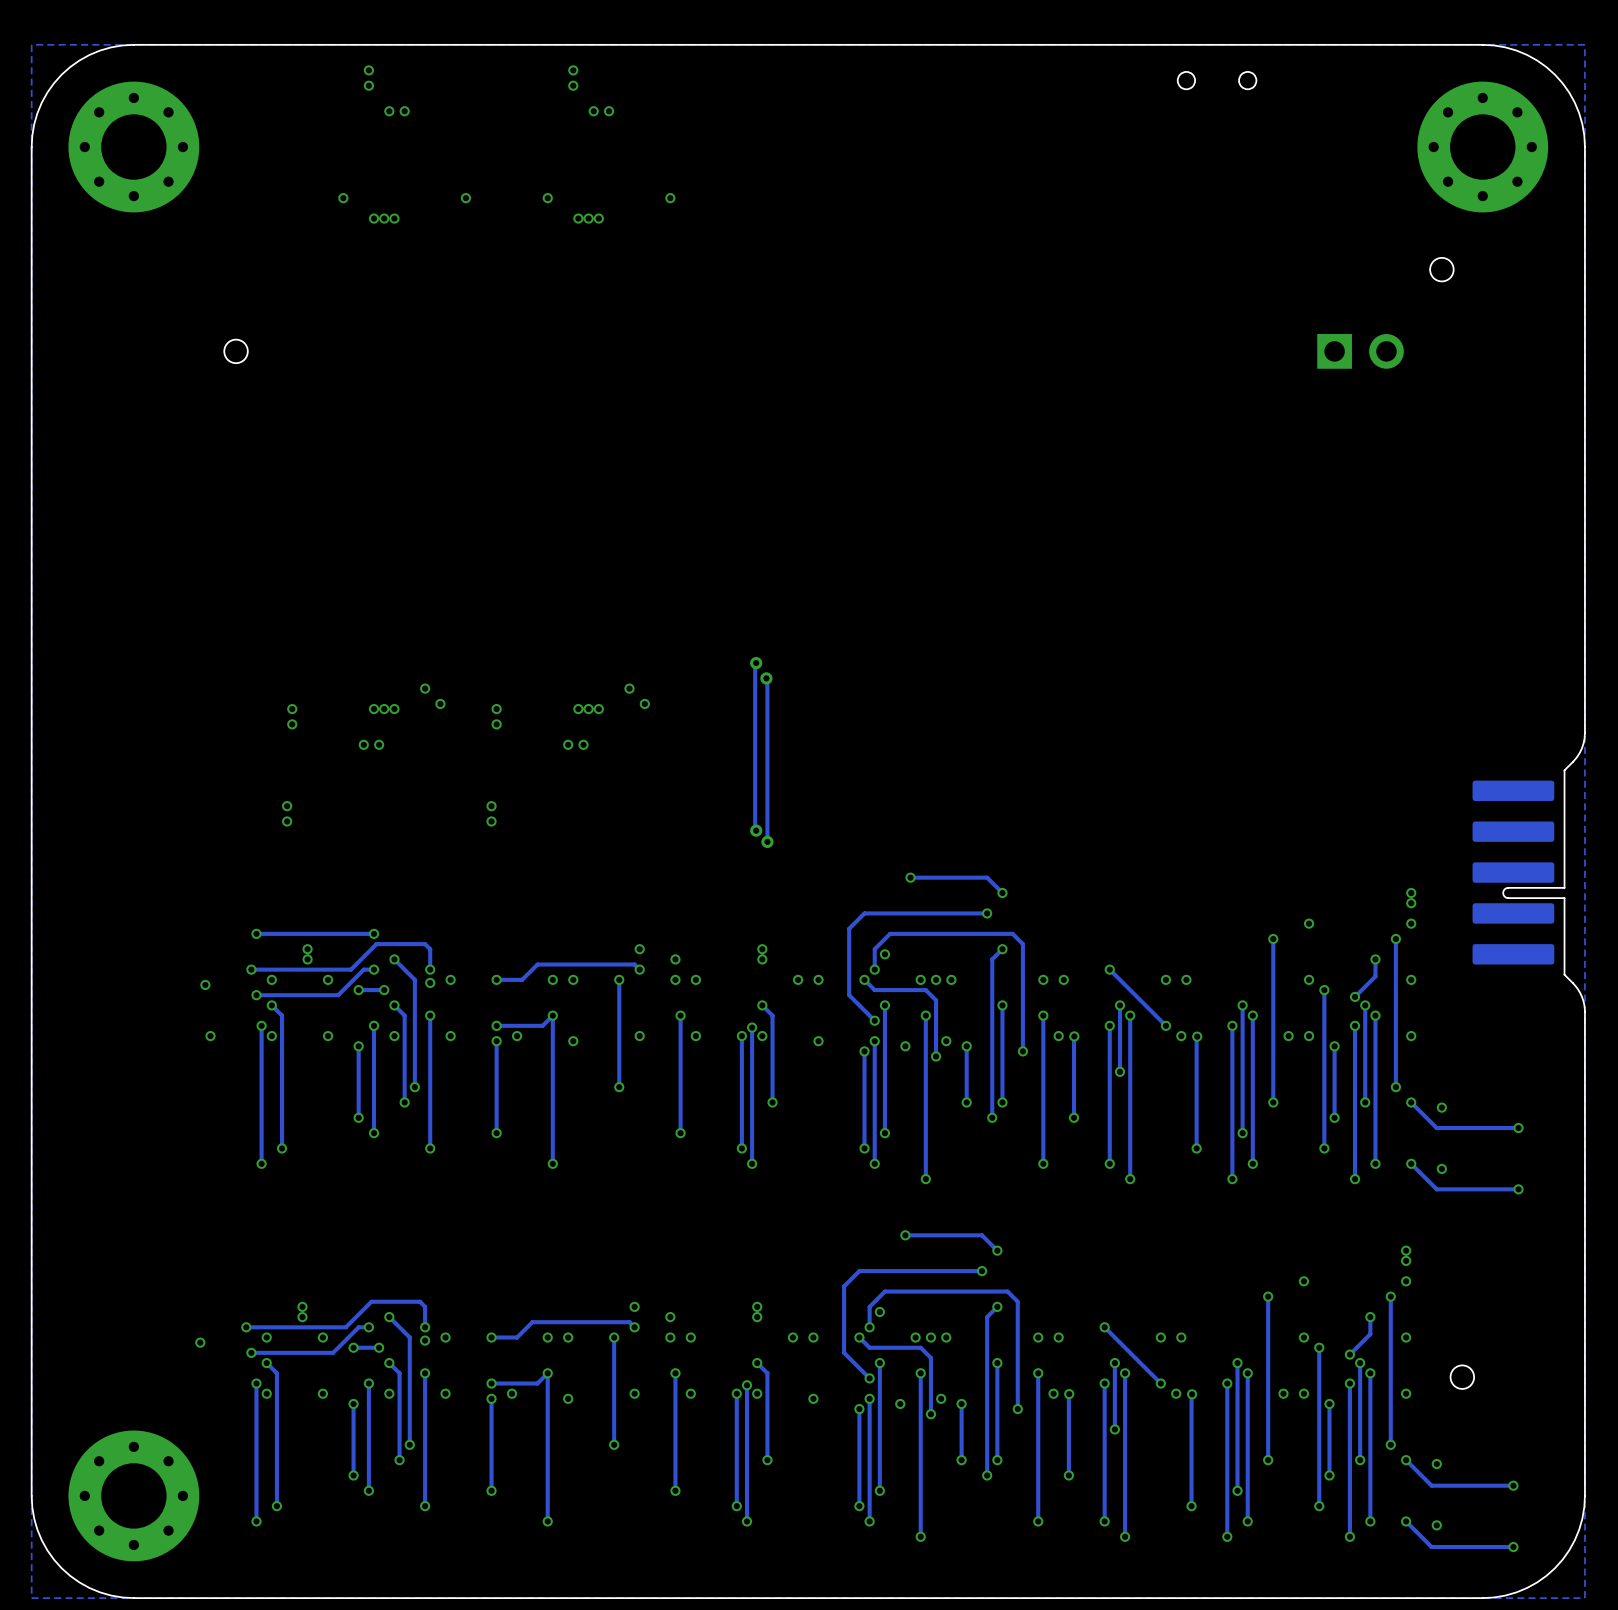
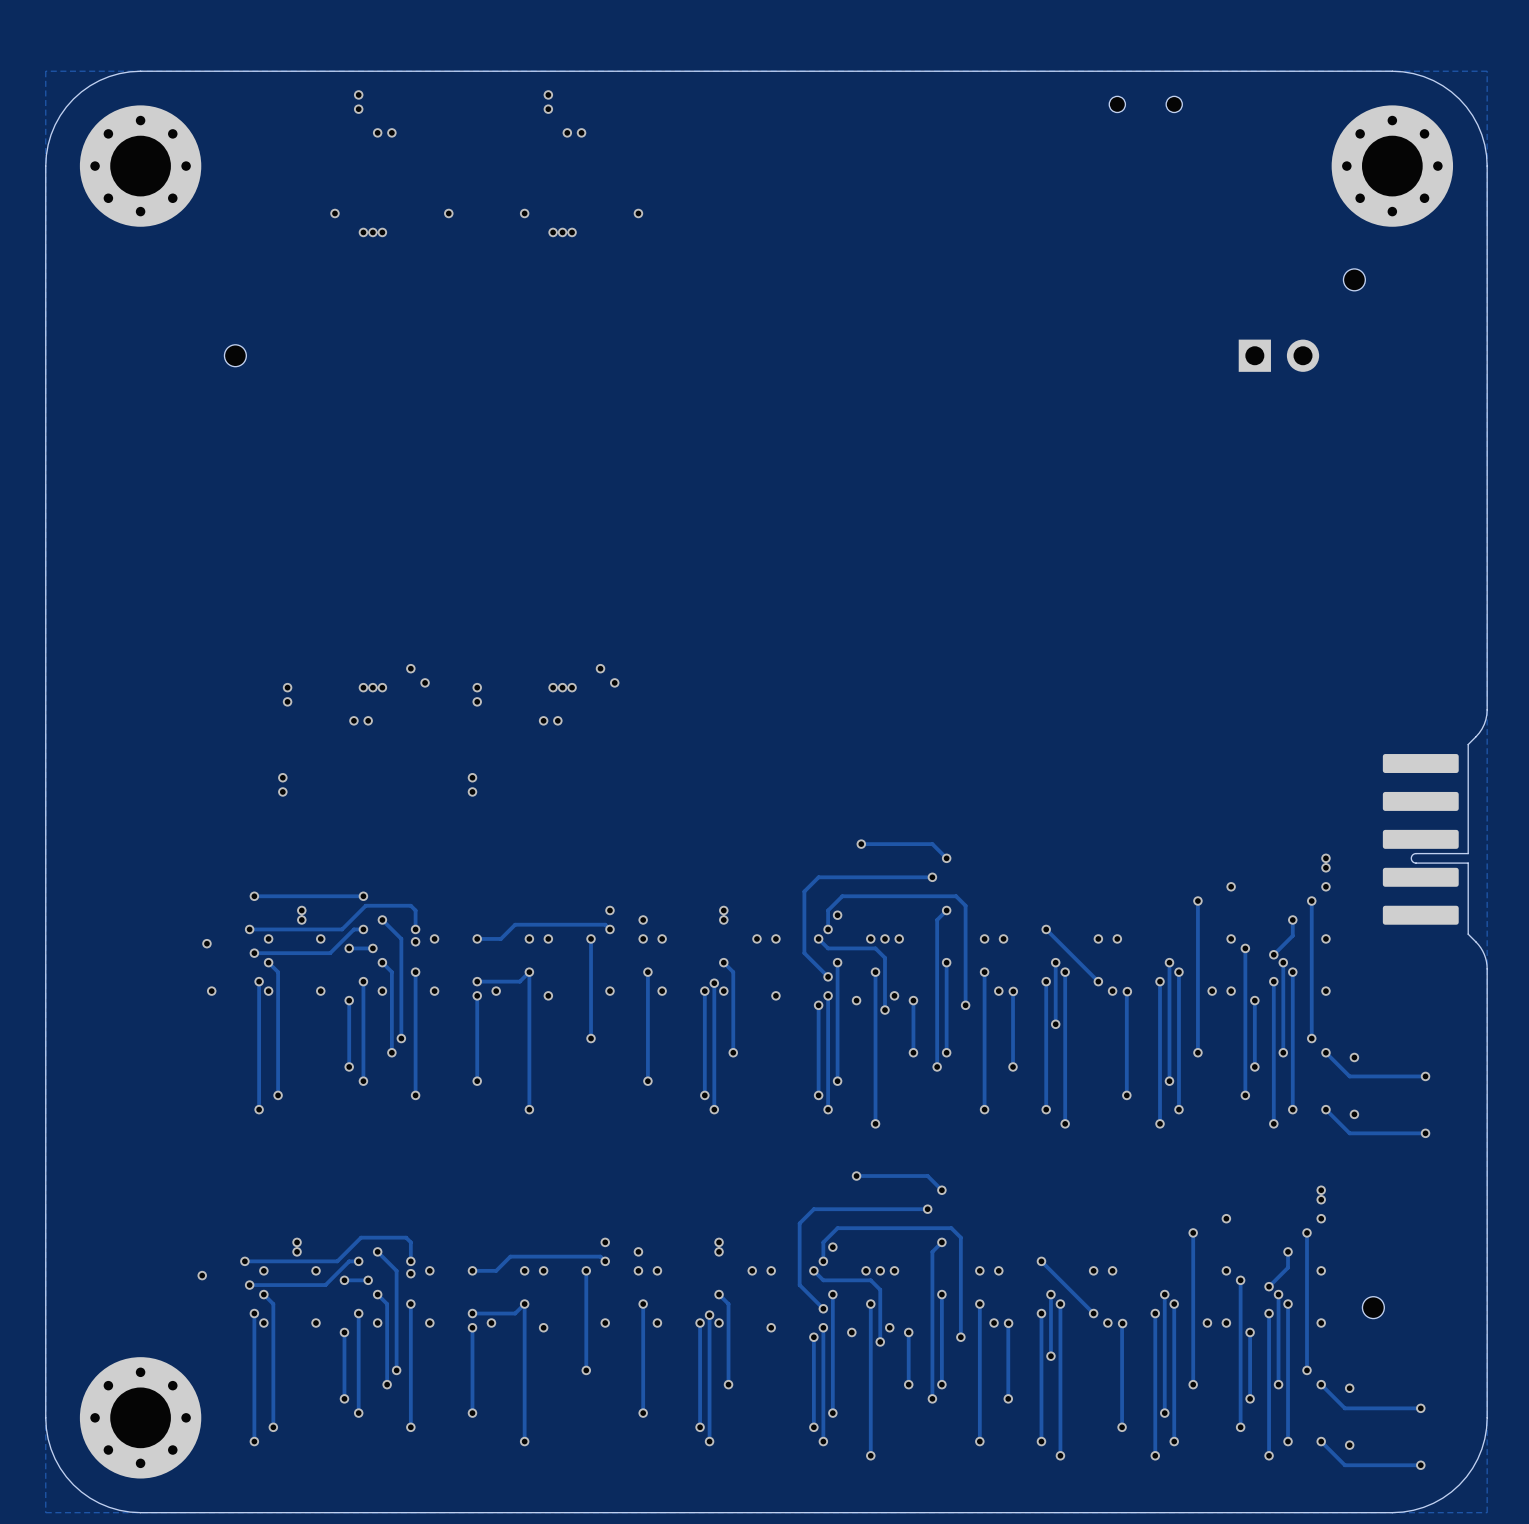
track: (756, 663) (756, 830) -> none
via: (756, 663) -> none
track: (766, 678) (767, 841) -> none
via: (766, 678) -> none
via: (756, 830) -> none
via: (767, 841) -> none

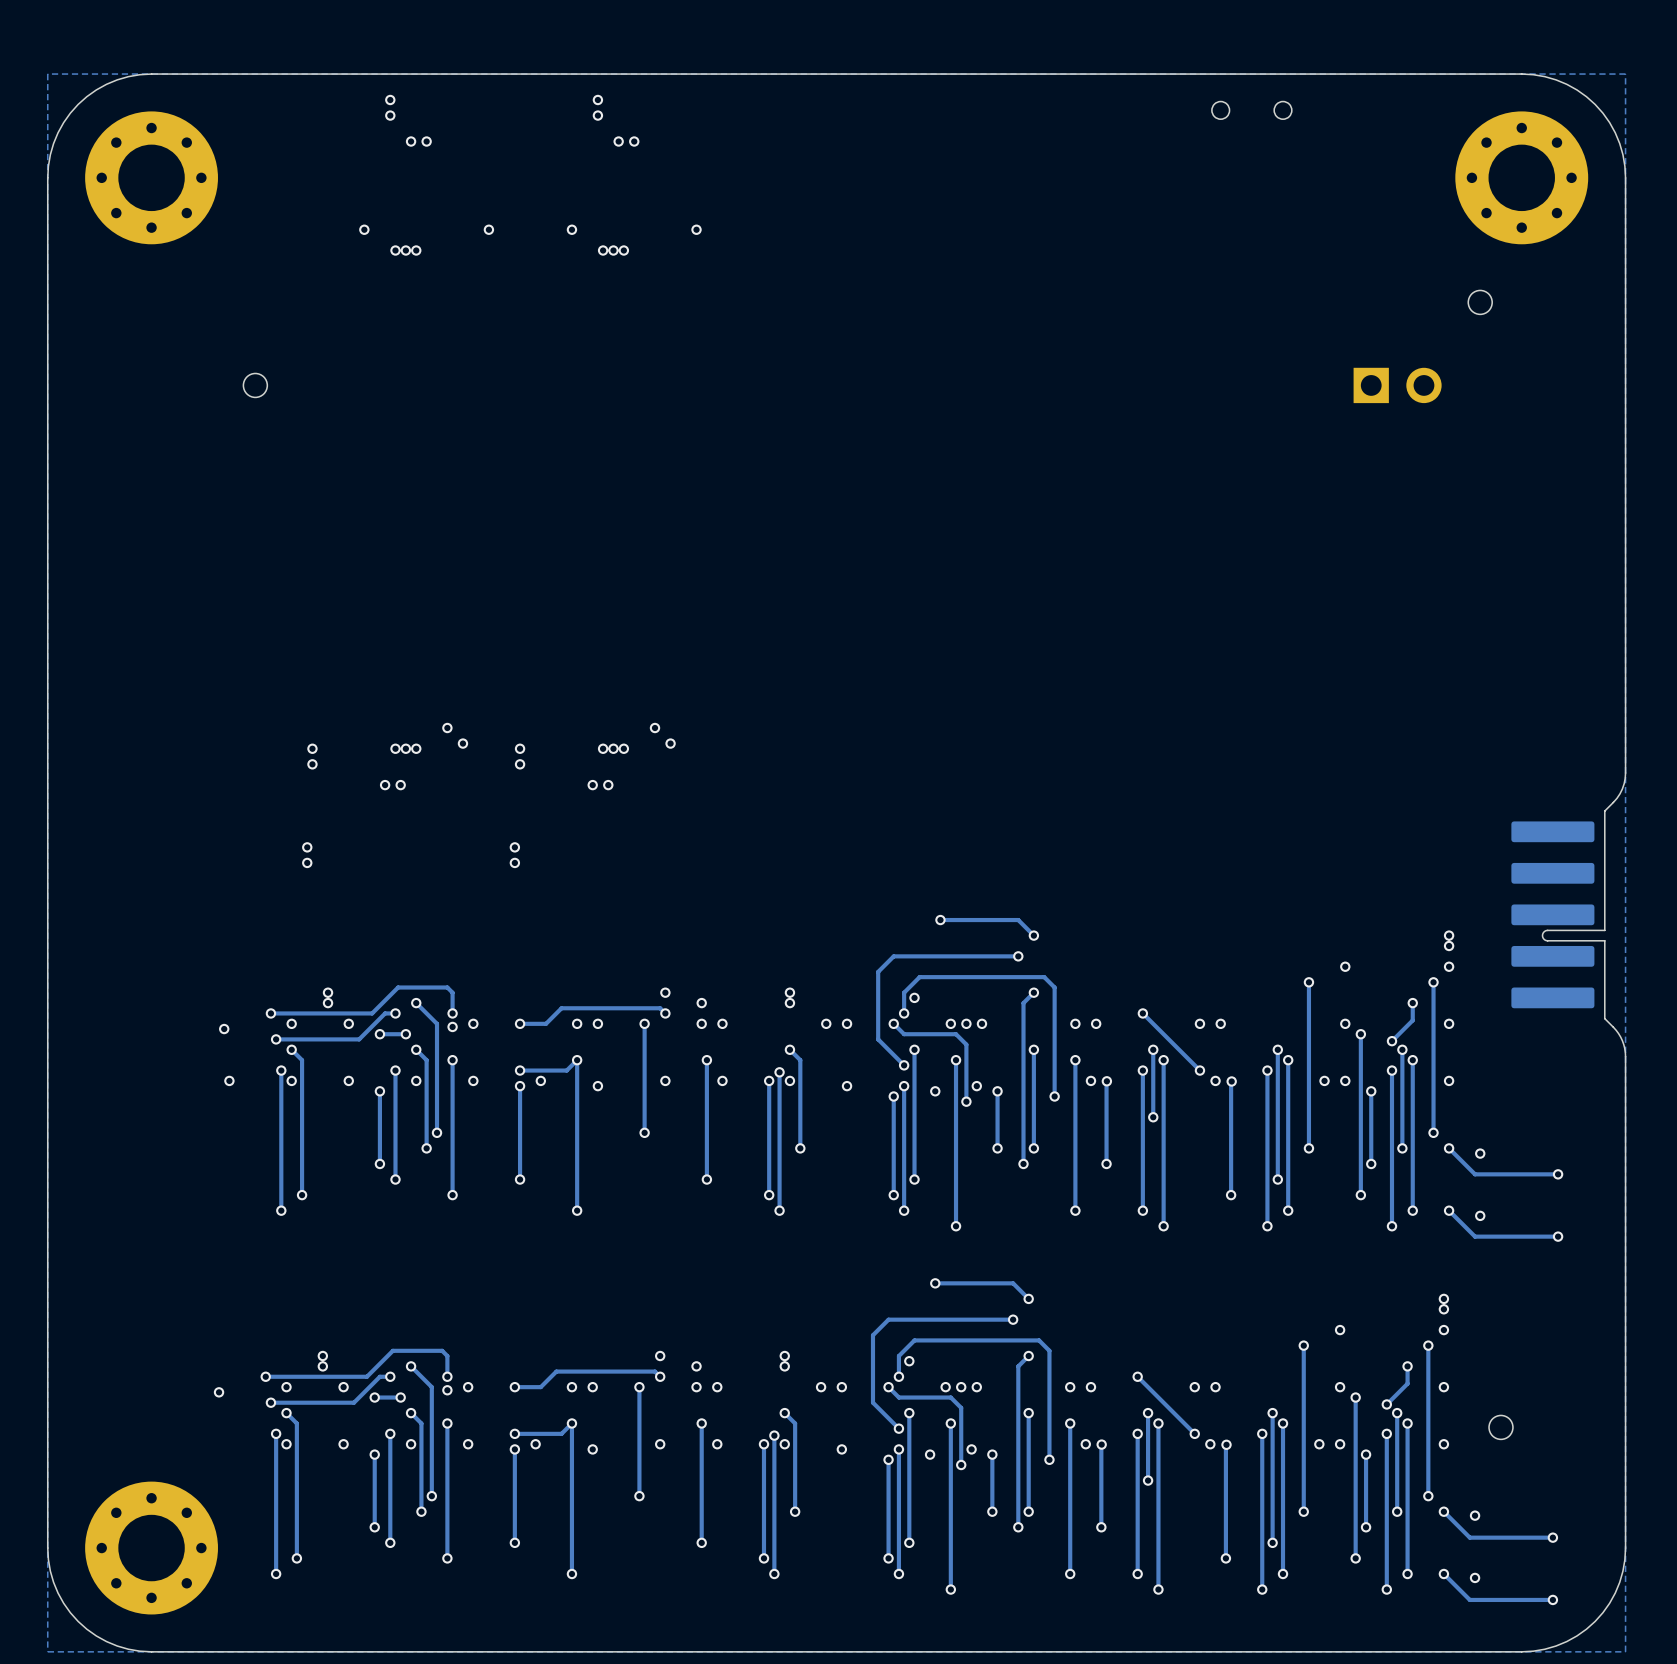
via: (254, 896) -> none
track: (363, 896) (254, 896) -> none
via: (363, 896) -> none

